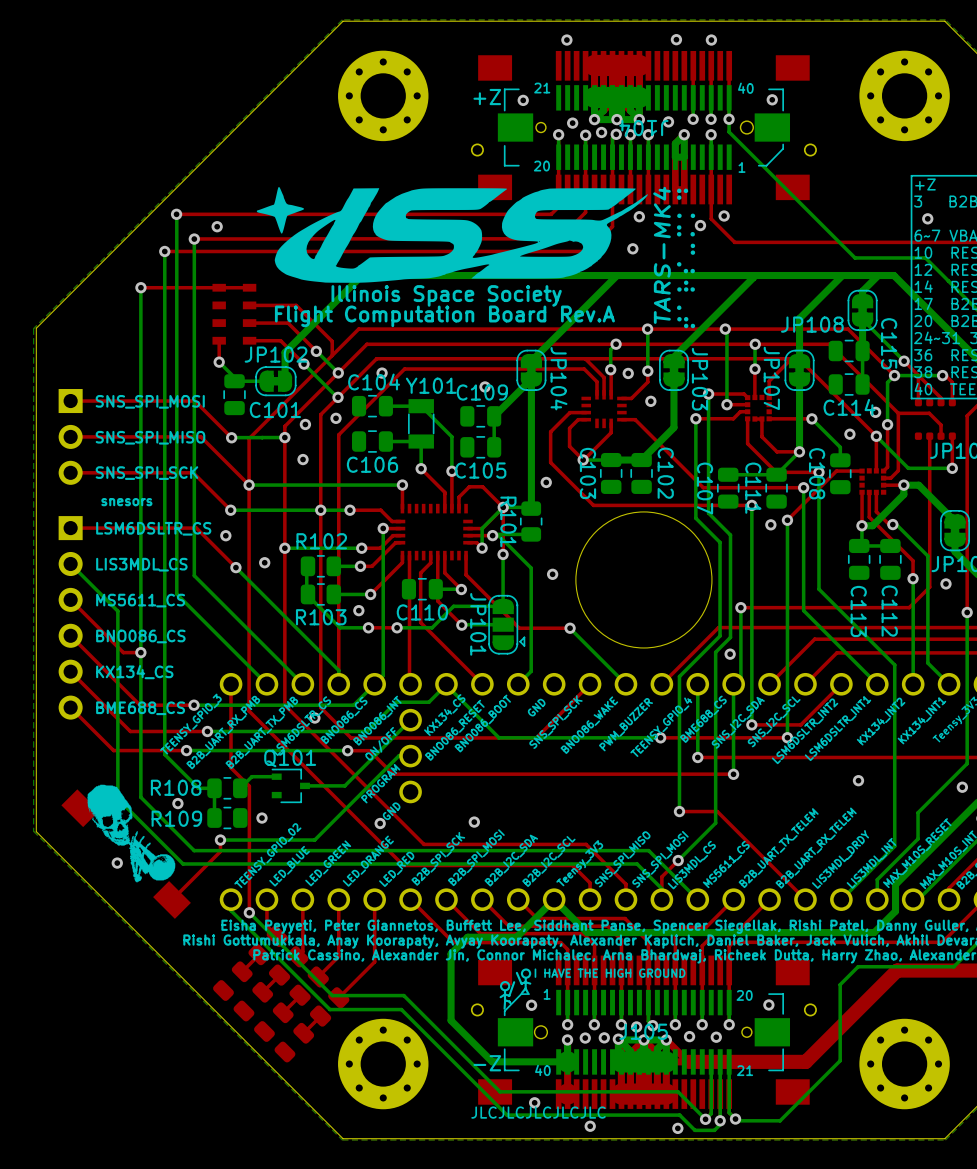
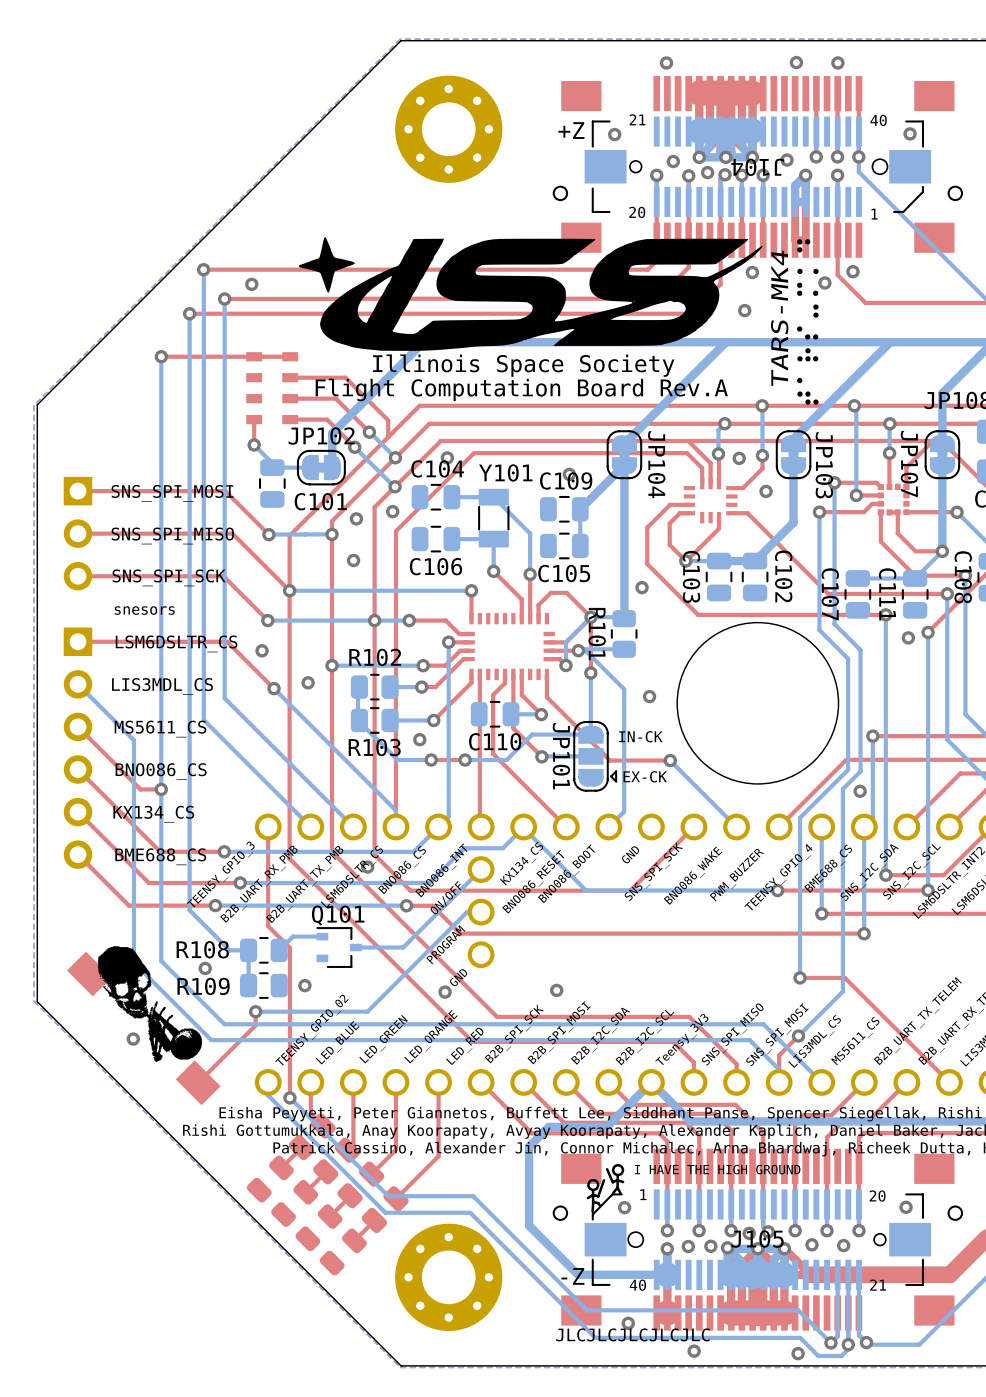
text: none -> IN-CK (640, 736)
text: none -> EX-CK (645, 776)

